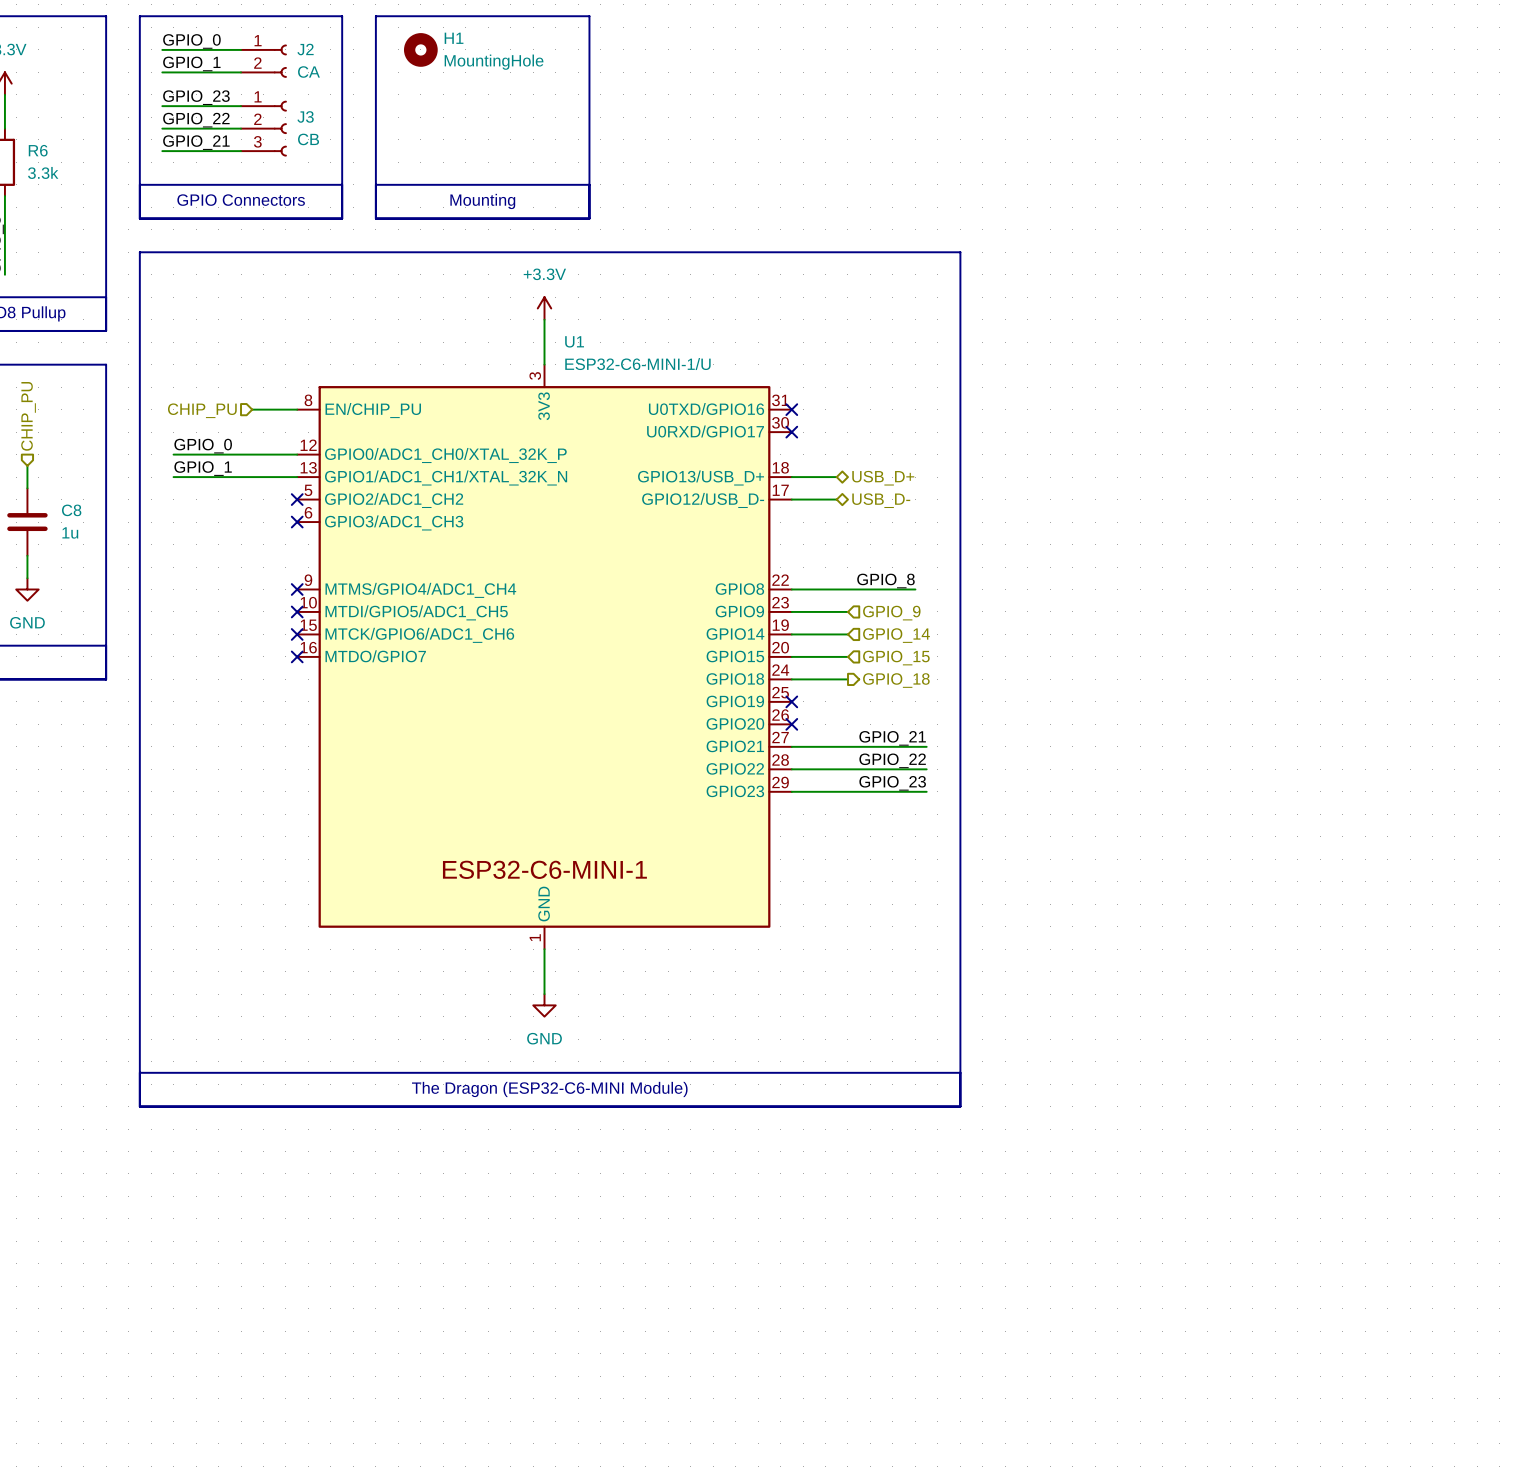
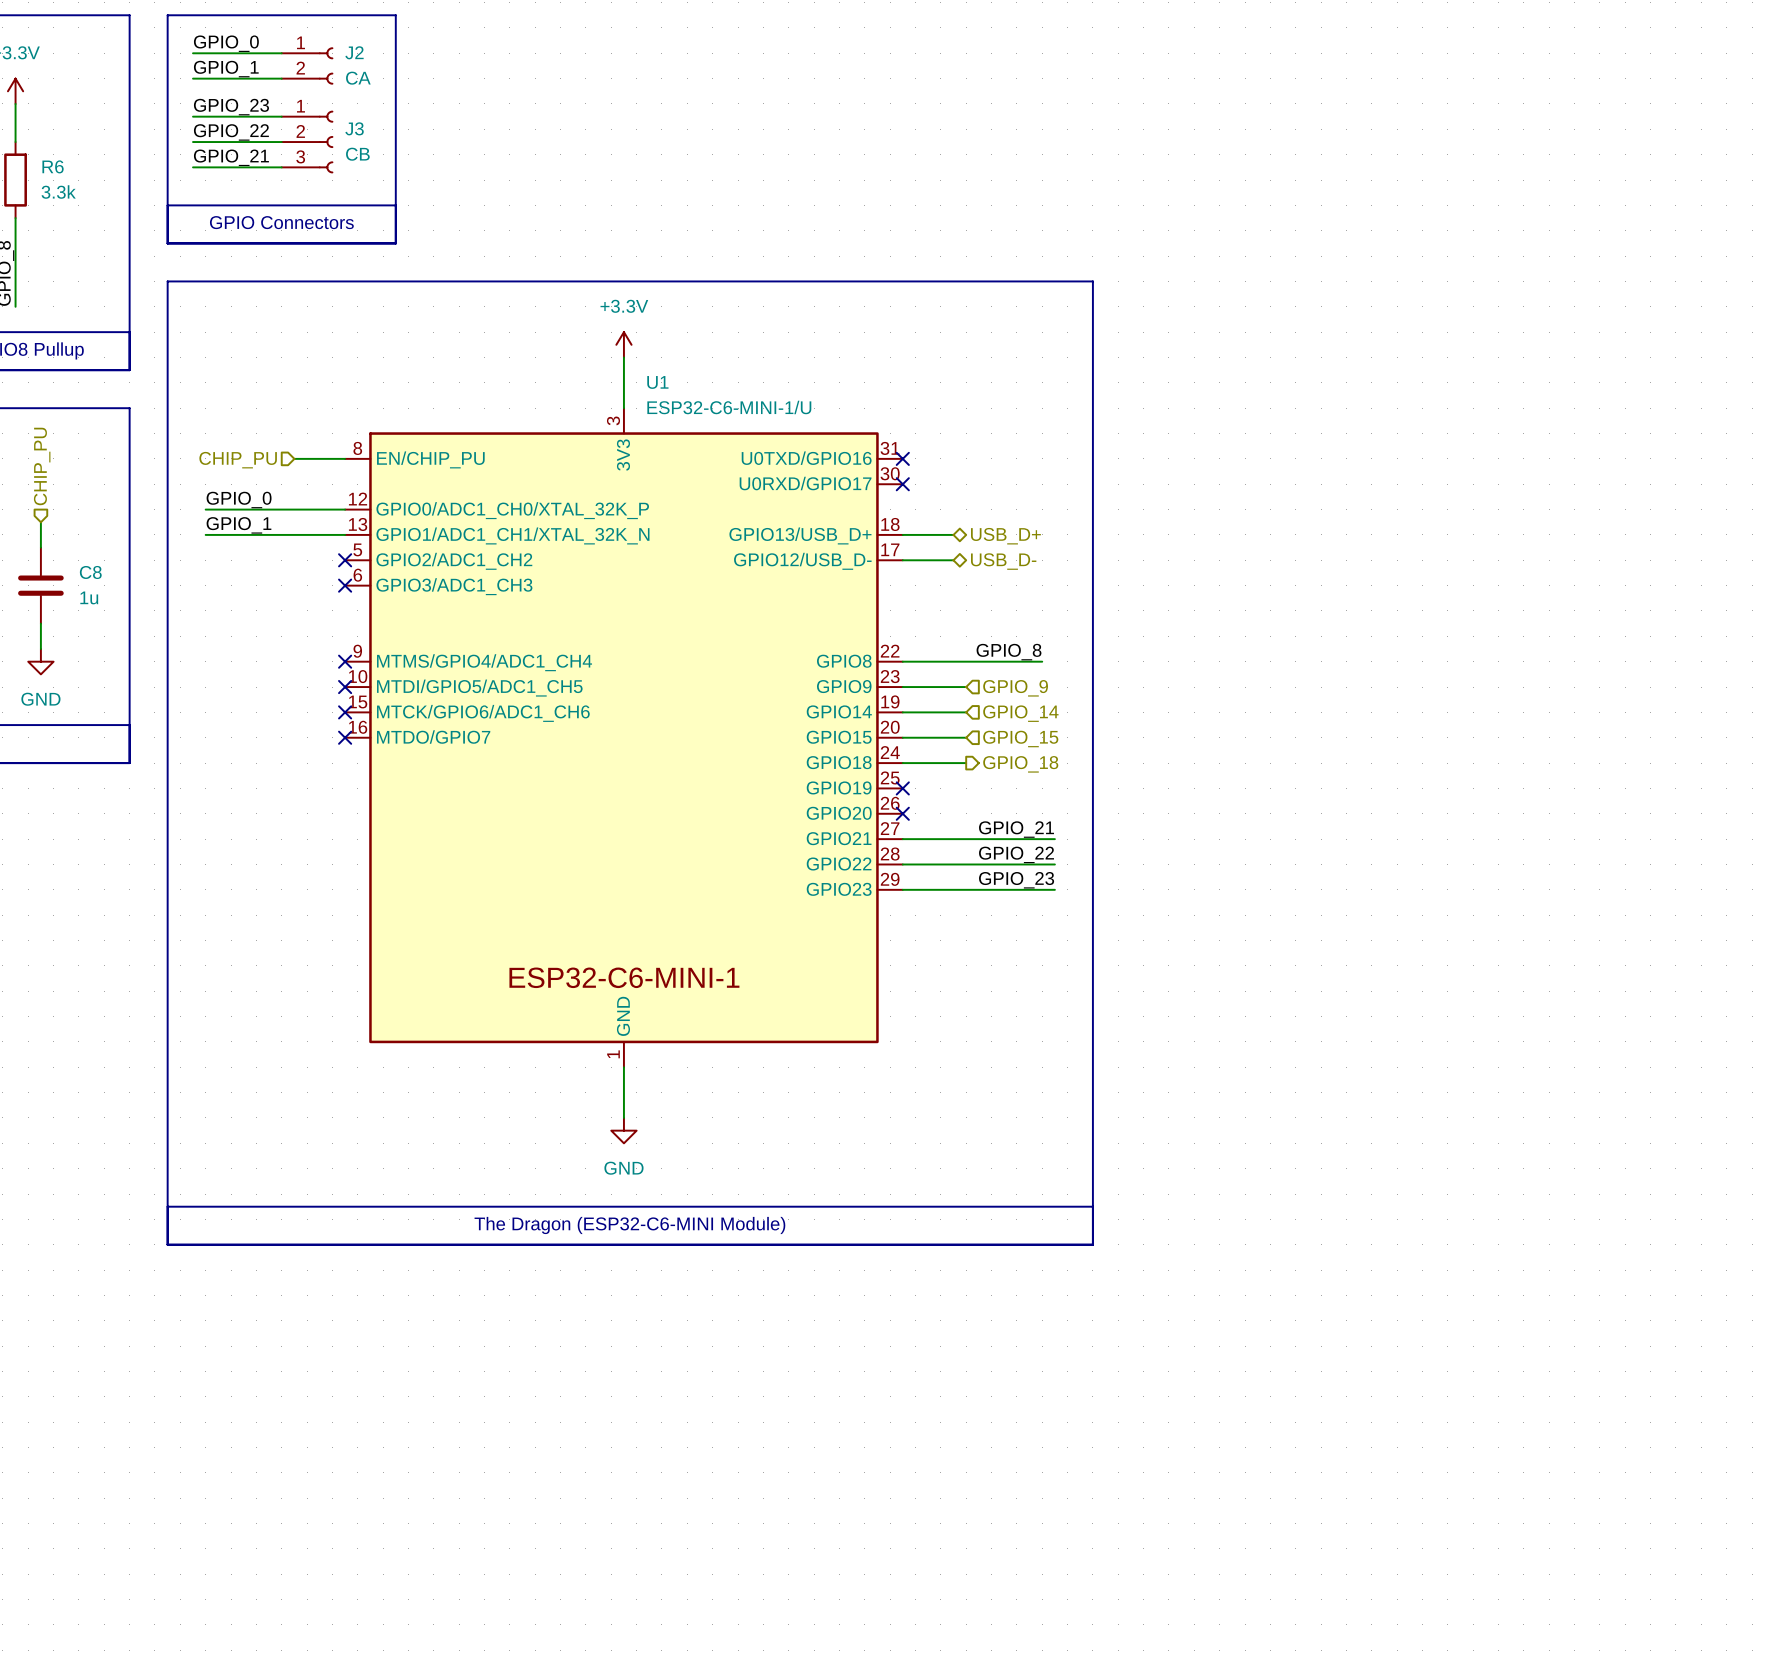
line: (375, 16) (589, 16) (589, 218) (375, 218) (375, 16) -> none
H1: MountingHole (420, 49) -> none
line: (375, 184) (589, 184) -> none
text: Mounting (482, 201) -> none

